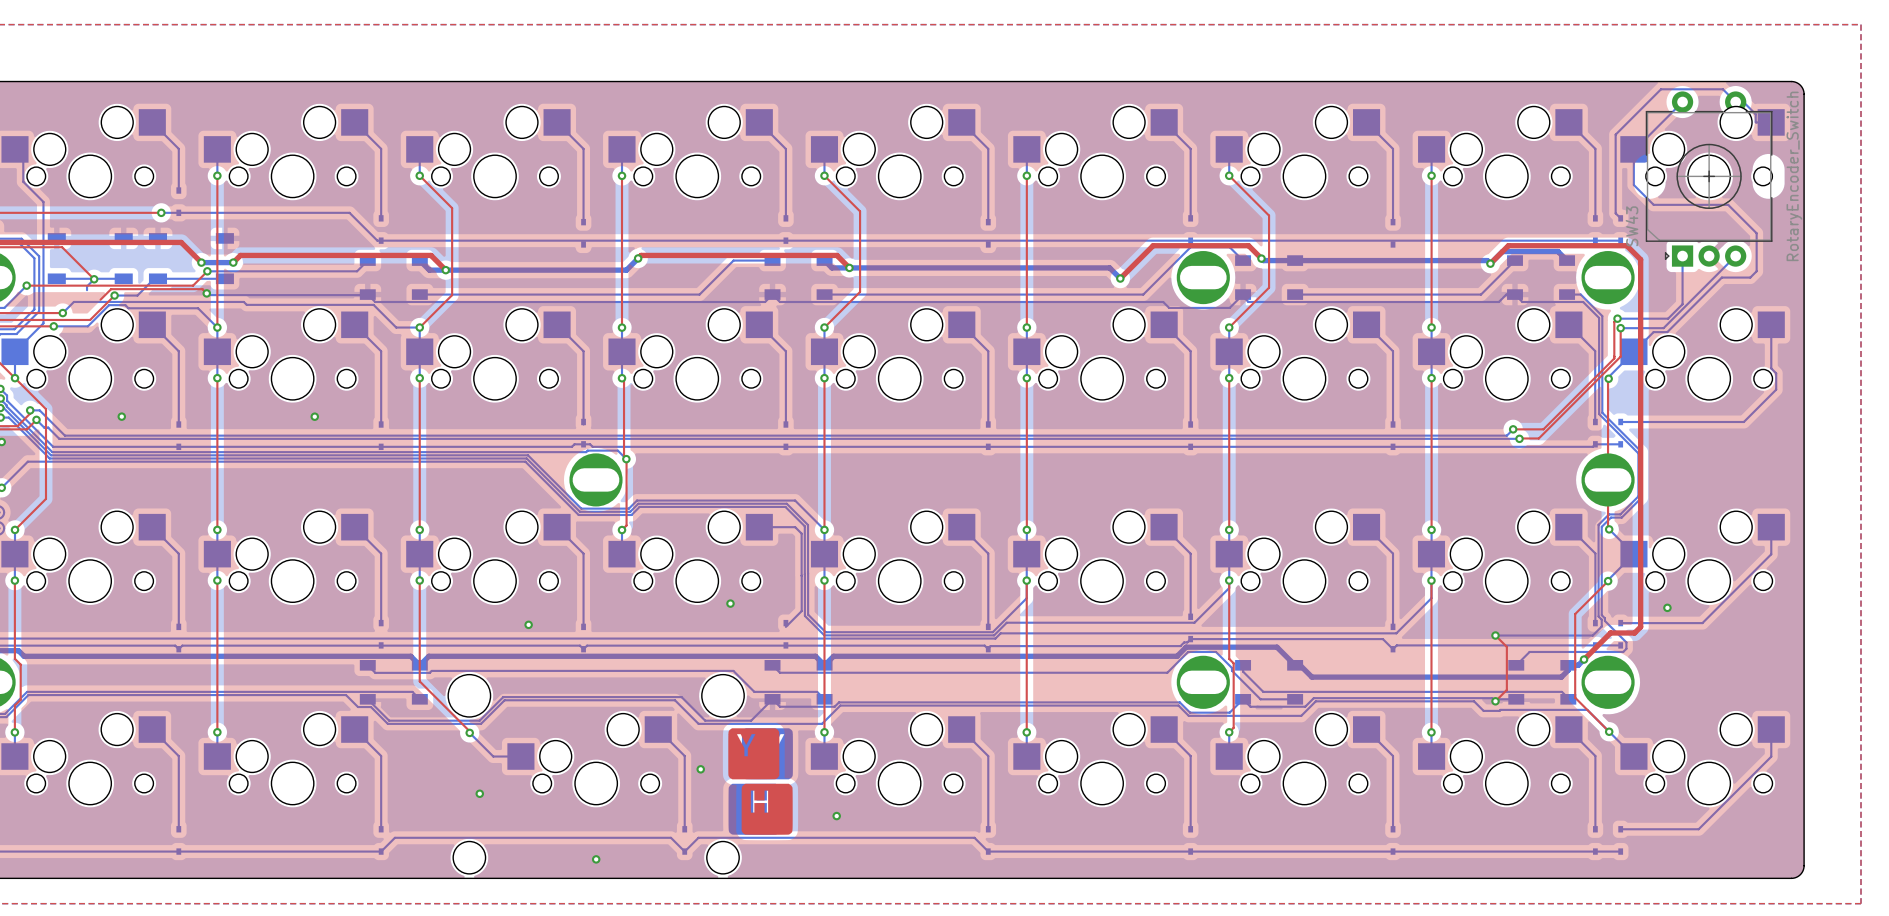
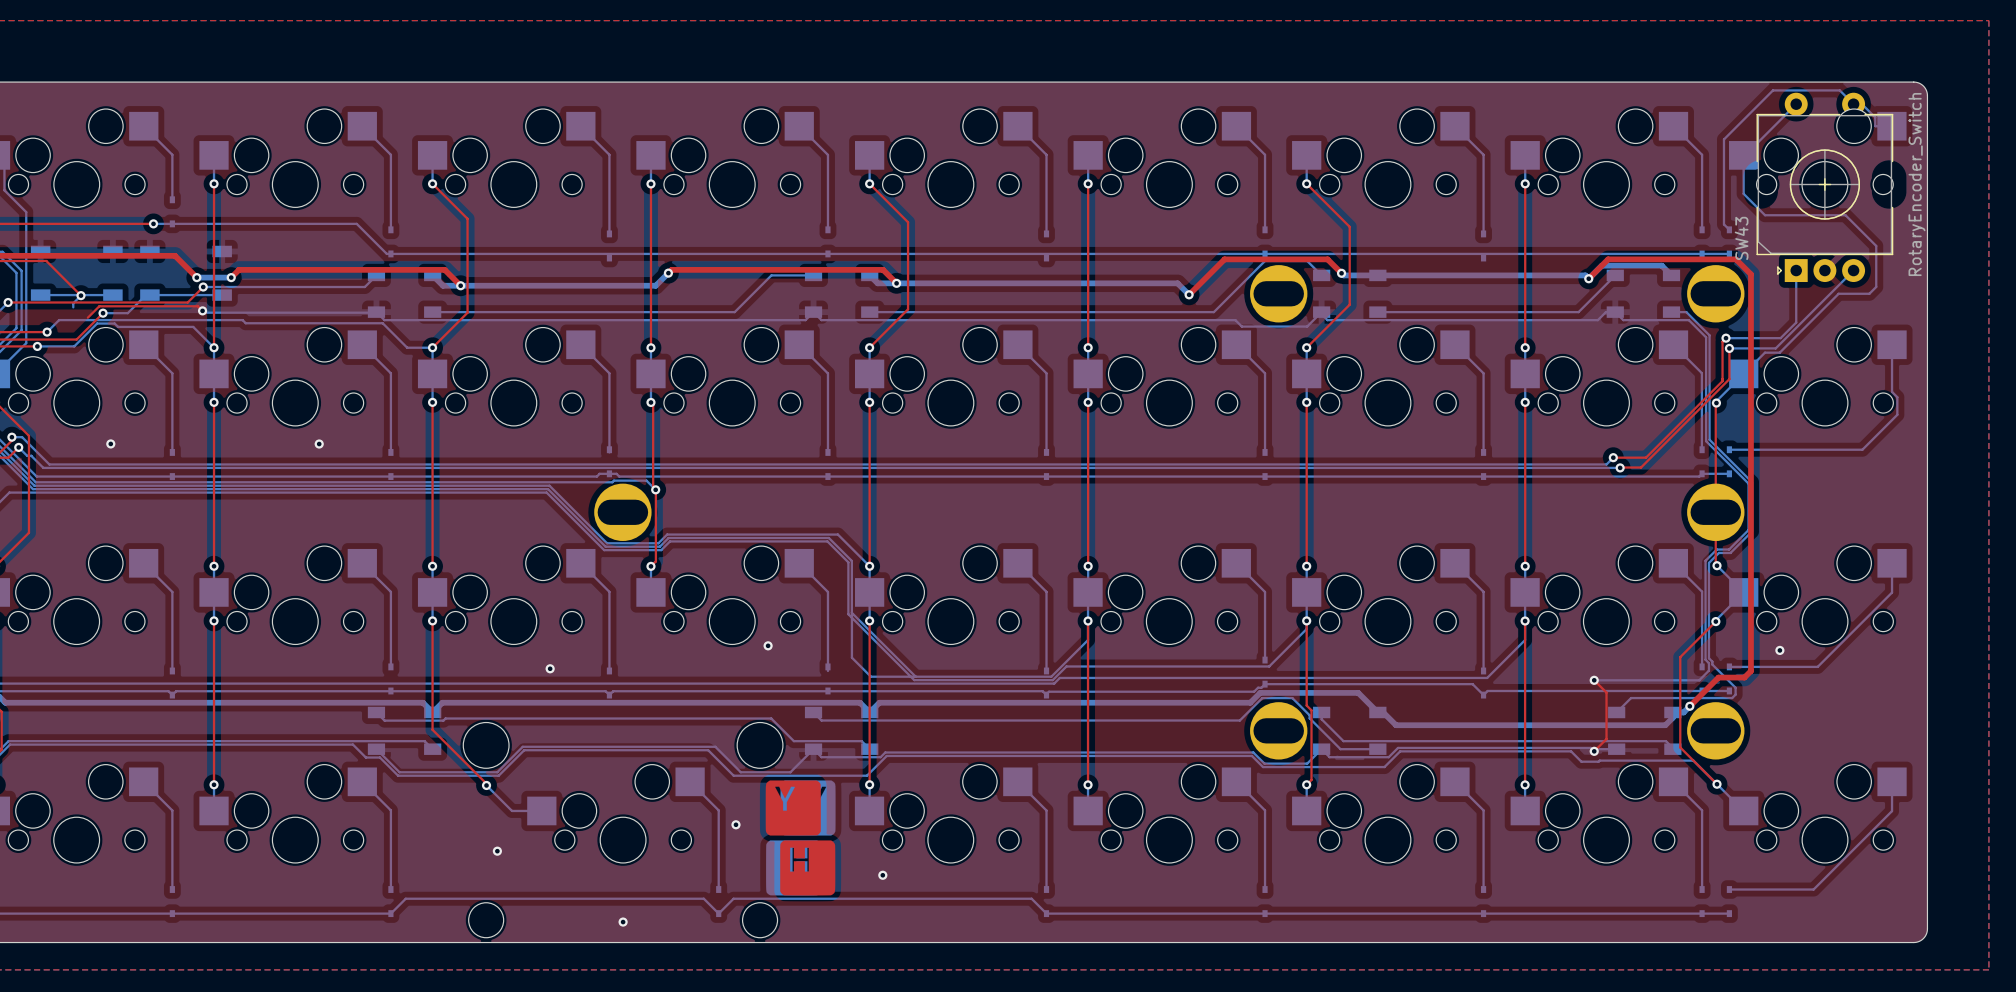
bottom track: (759, 527) (795, 527) (801, 533) (801, 575) -> (799, 563) (827, 592) (827, 670)
bottom track: (804, 574) (804, 615) (824, 635) (865, 635) -> (848, 614) (914, 680)
bottom track: (801, 575) (801, 611) (785, 626) -> none

